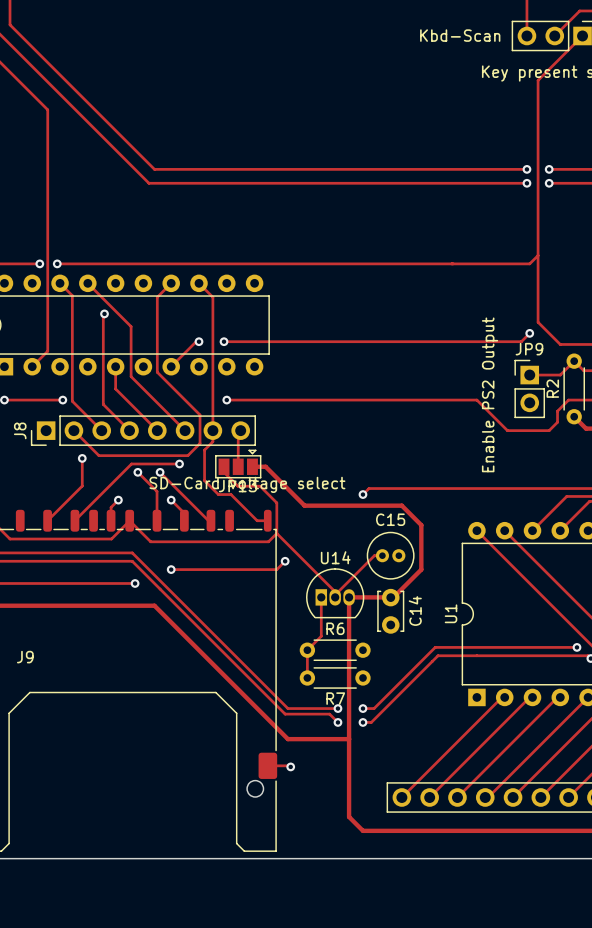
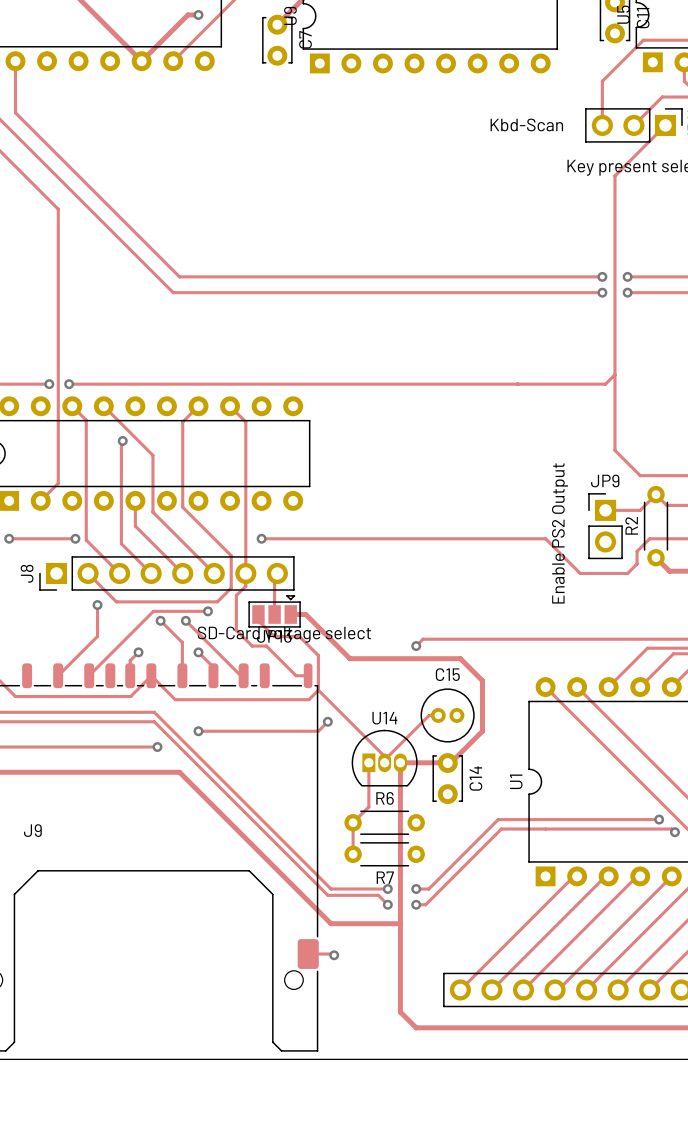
track: (529, 333) (521, 341) (224, 341) -> none
via: (529, 333) -> none
track: (199, 341) (196, 341) (171, 366) -> none
via: (199, 341) -> none
via: (224, 341) -> none

